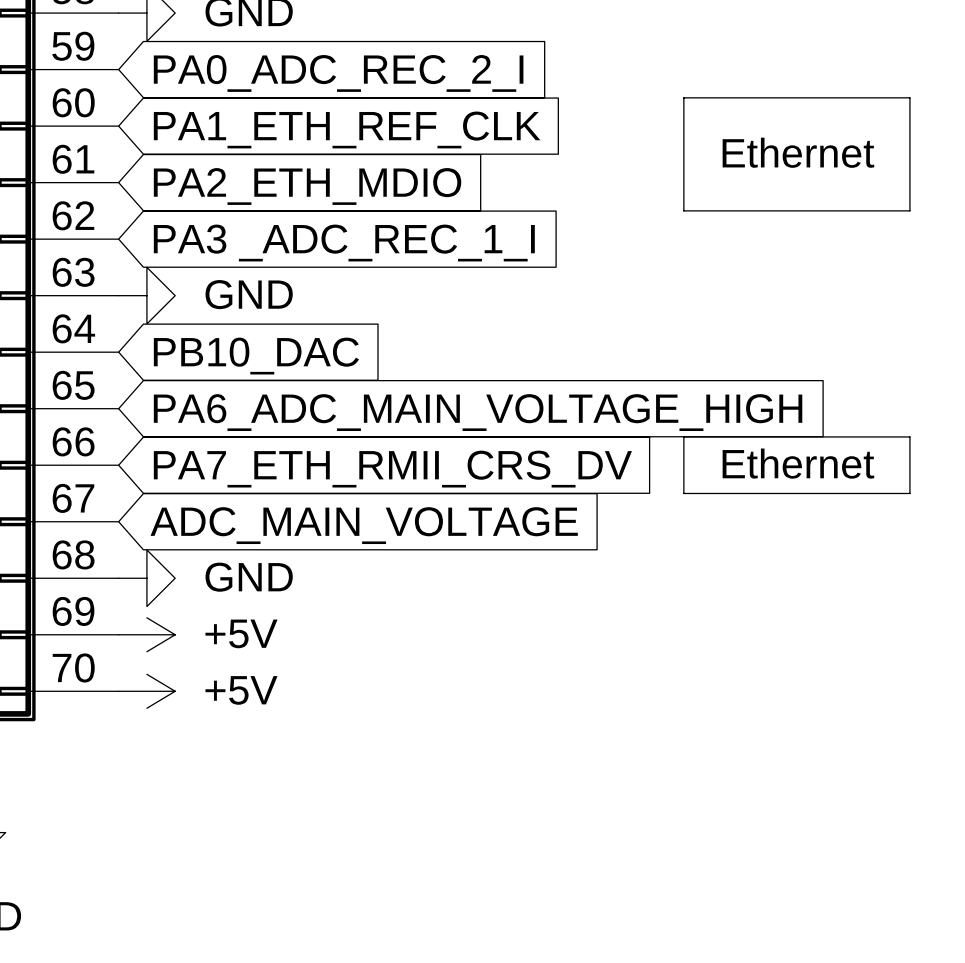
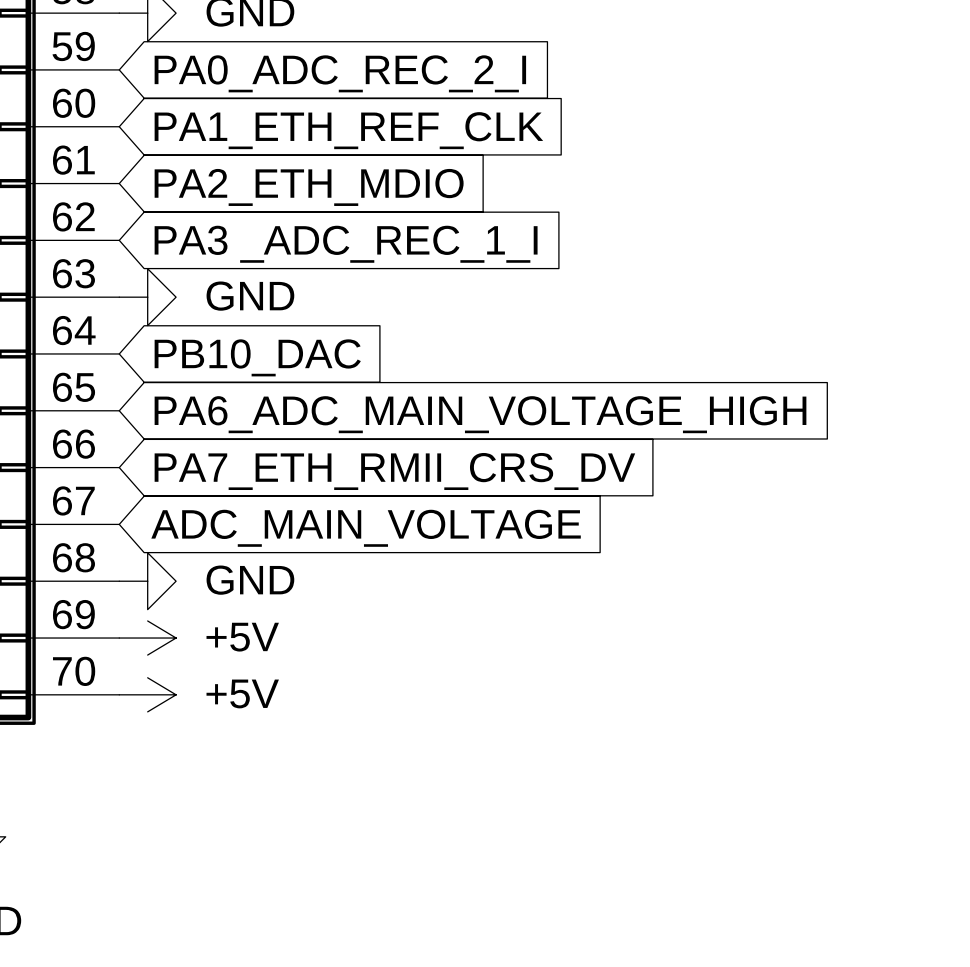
line: (683, 97) (683, 210) (909, 210) (909, 97) (683, 97) -> none
text: Ethernet (798, 152) -> none
line: (683, 436) (909, 436) (909, 493) (683, 493) (683, 436) -> none
text: Ethernet (798, 463) -> none

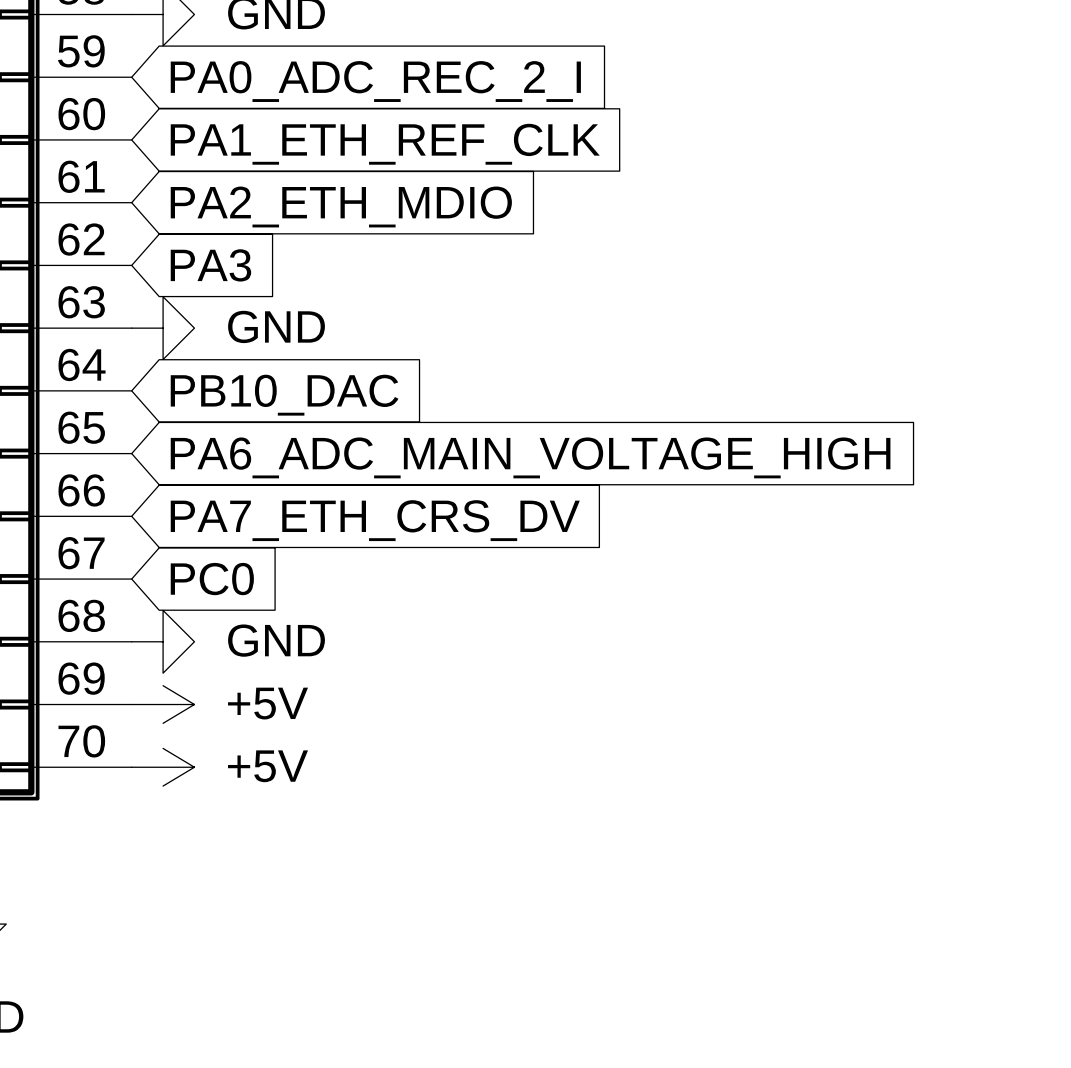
global label: PA3 _ADC_REC_1_I (346, 244) -> PA3 (210, 265)
global label: PA7_ETH_RMII_CRS_DV (394, 471) -> PA7_ETH_CRS_DV (375, 520)
global label: ADC_MAIN_VOLTAGE (366, 528) -> PC0 (212, 579)

